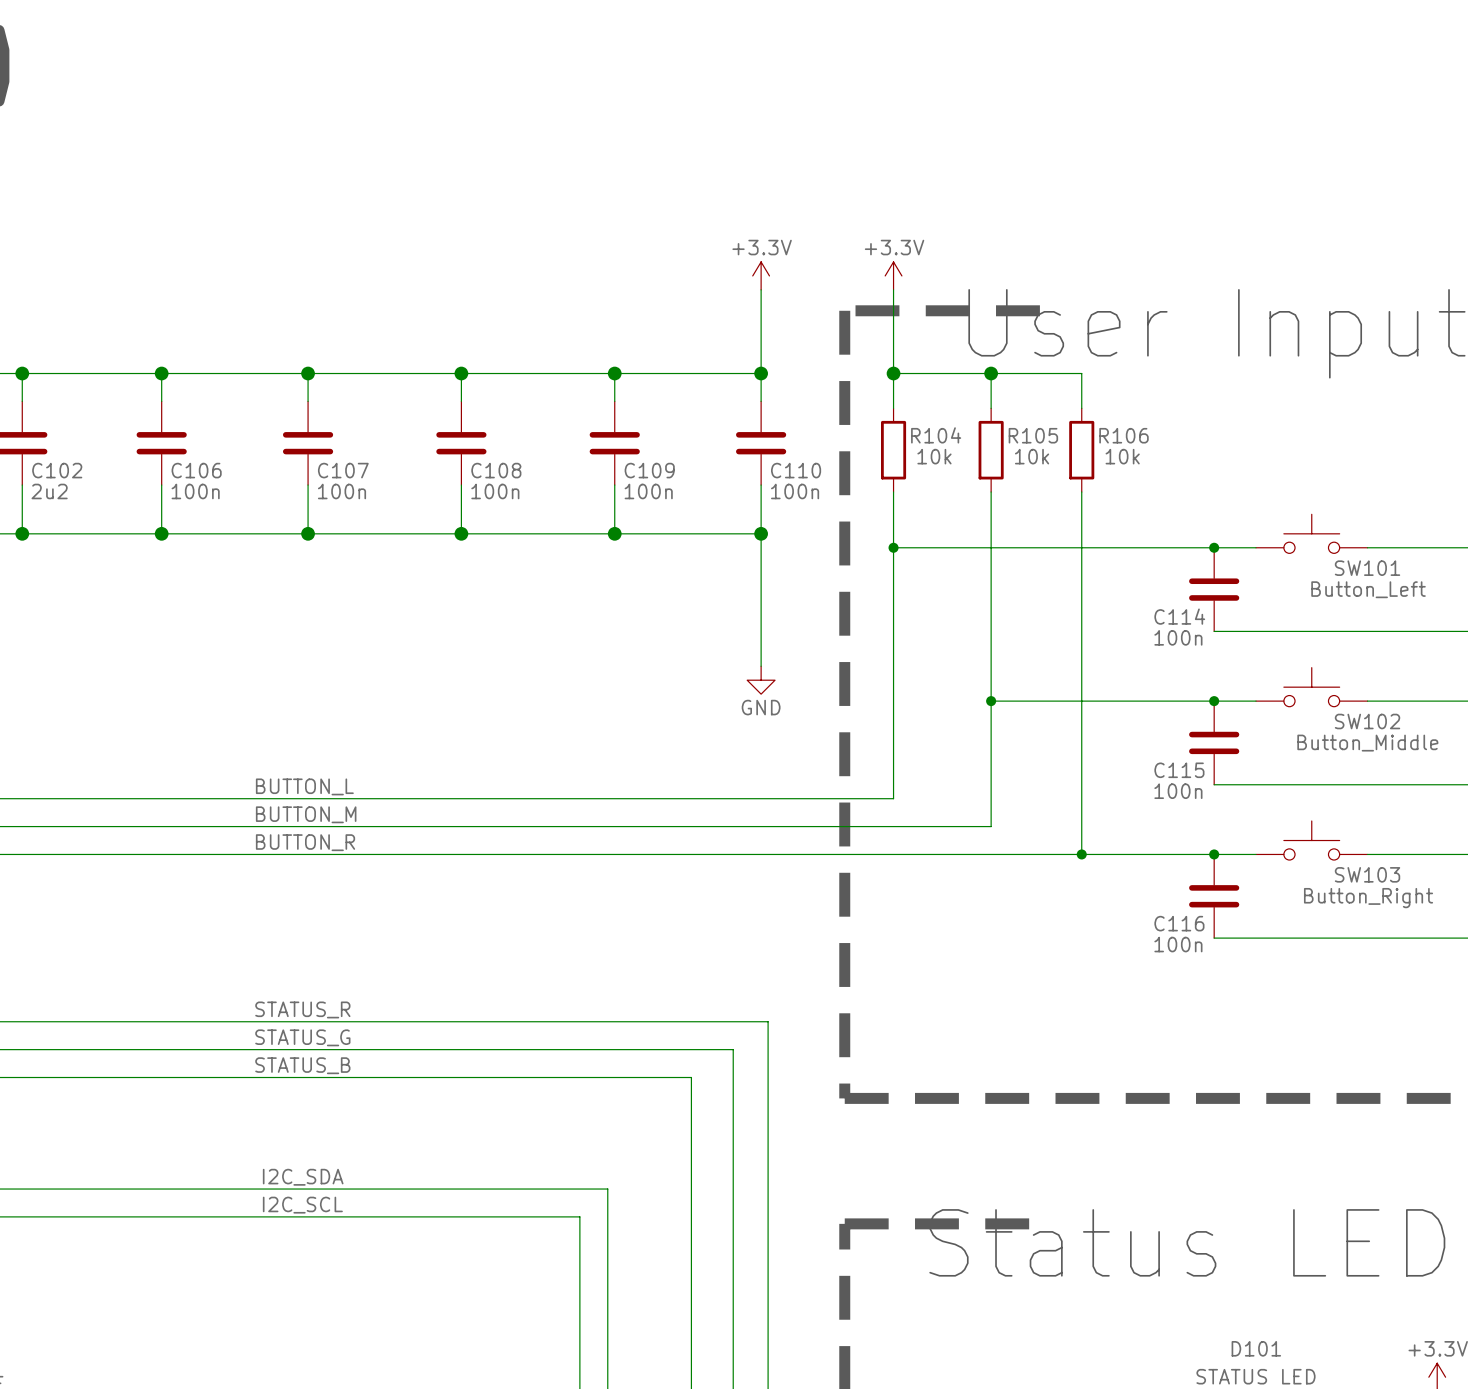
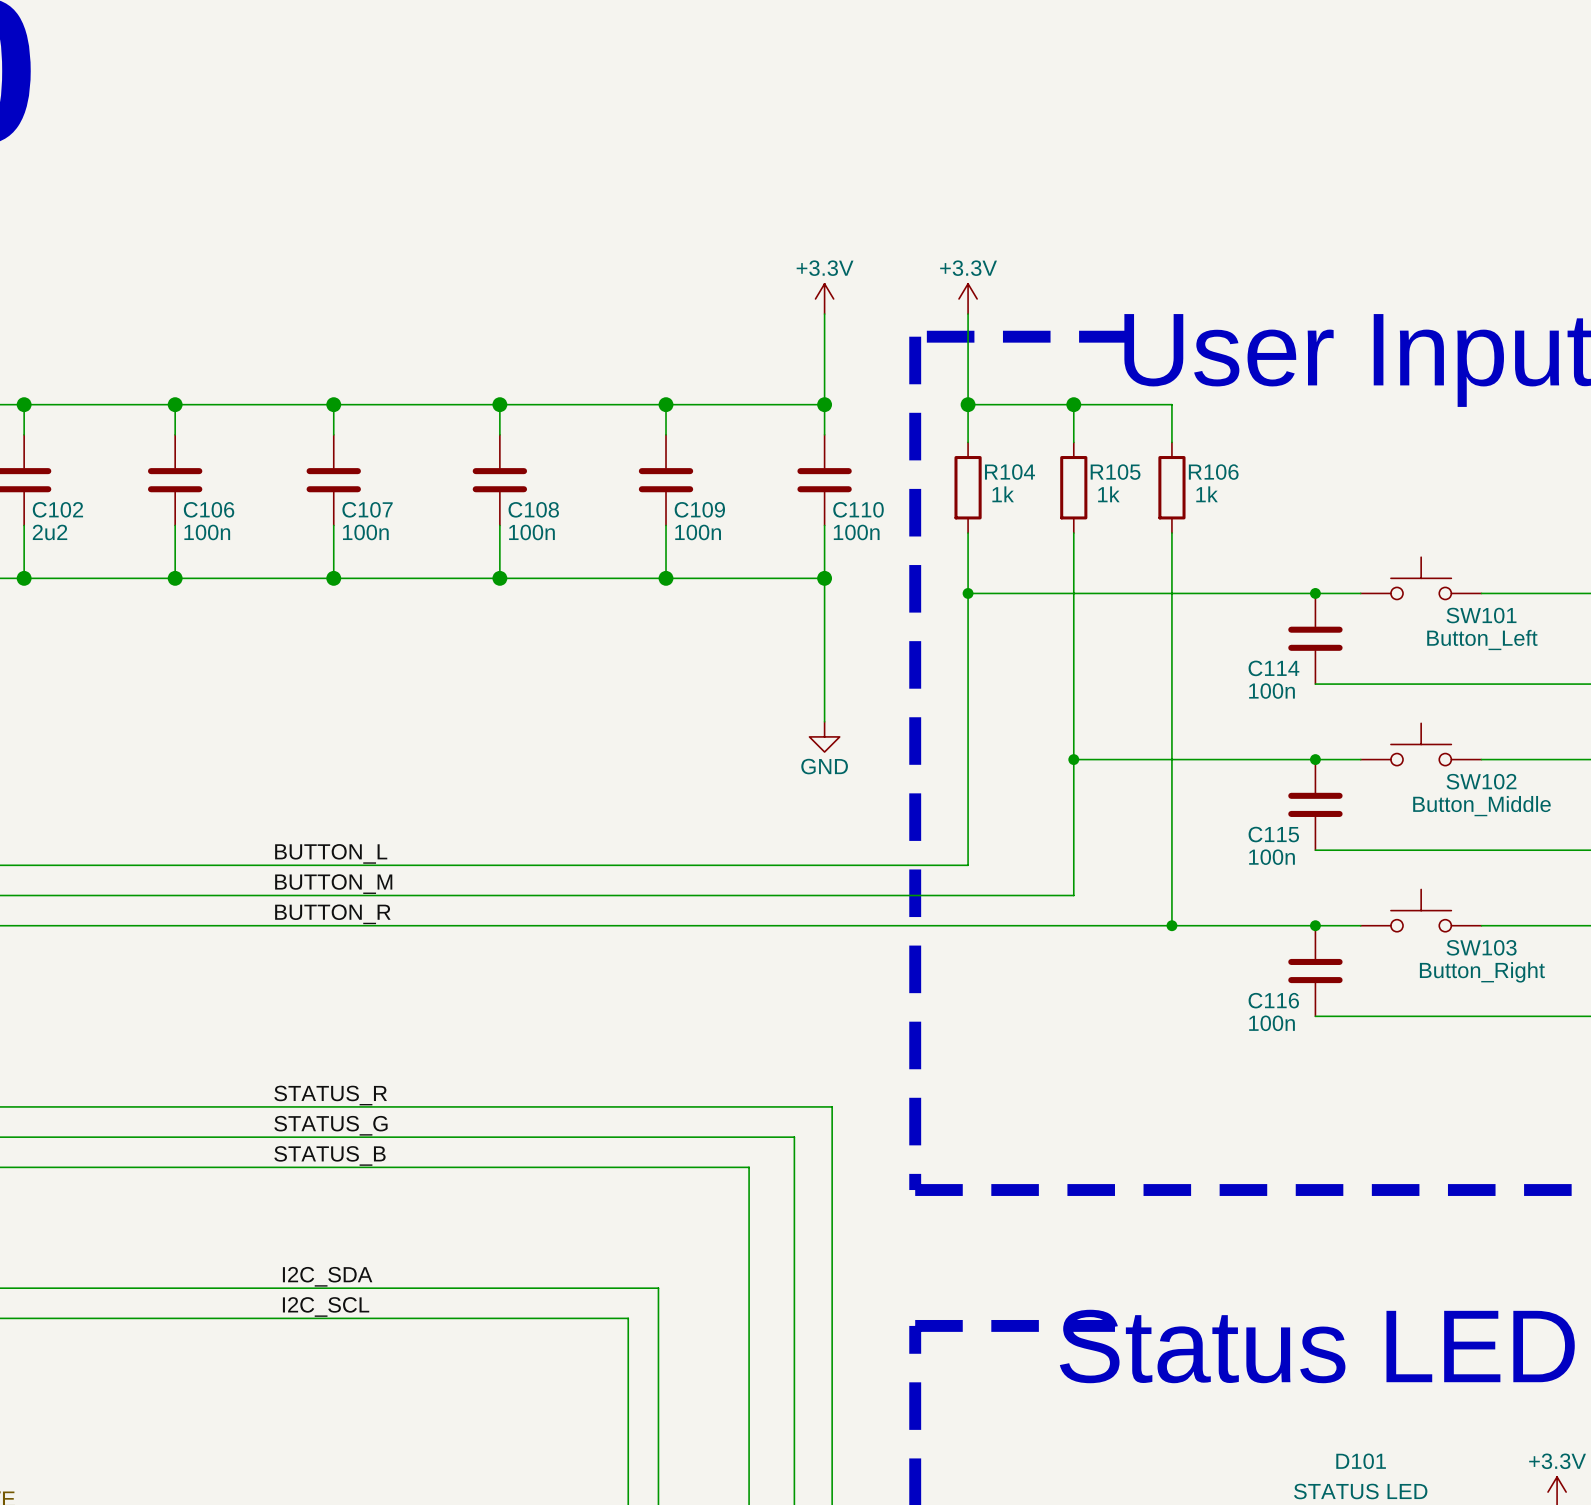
R104 value: 10k (934, 456) -> 1k (1003, 494)
R105 value: 10k (1032, 456) -> 1k (1108, 494)
R106 value: 10k (1122, 456) -> 1k (1207, 494)

